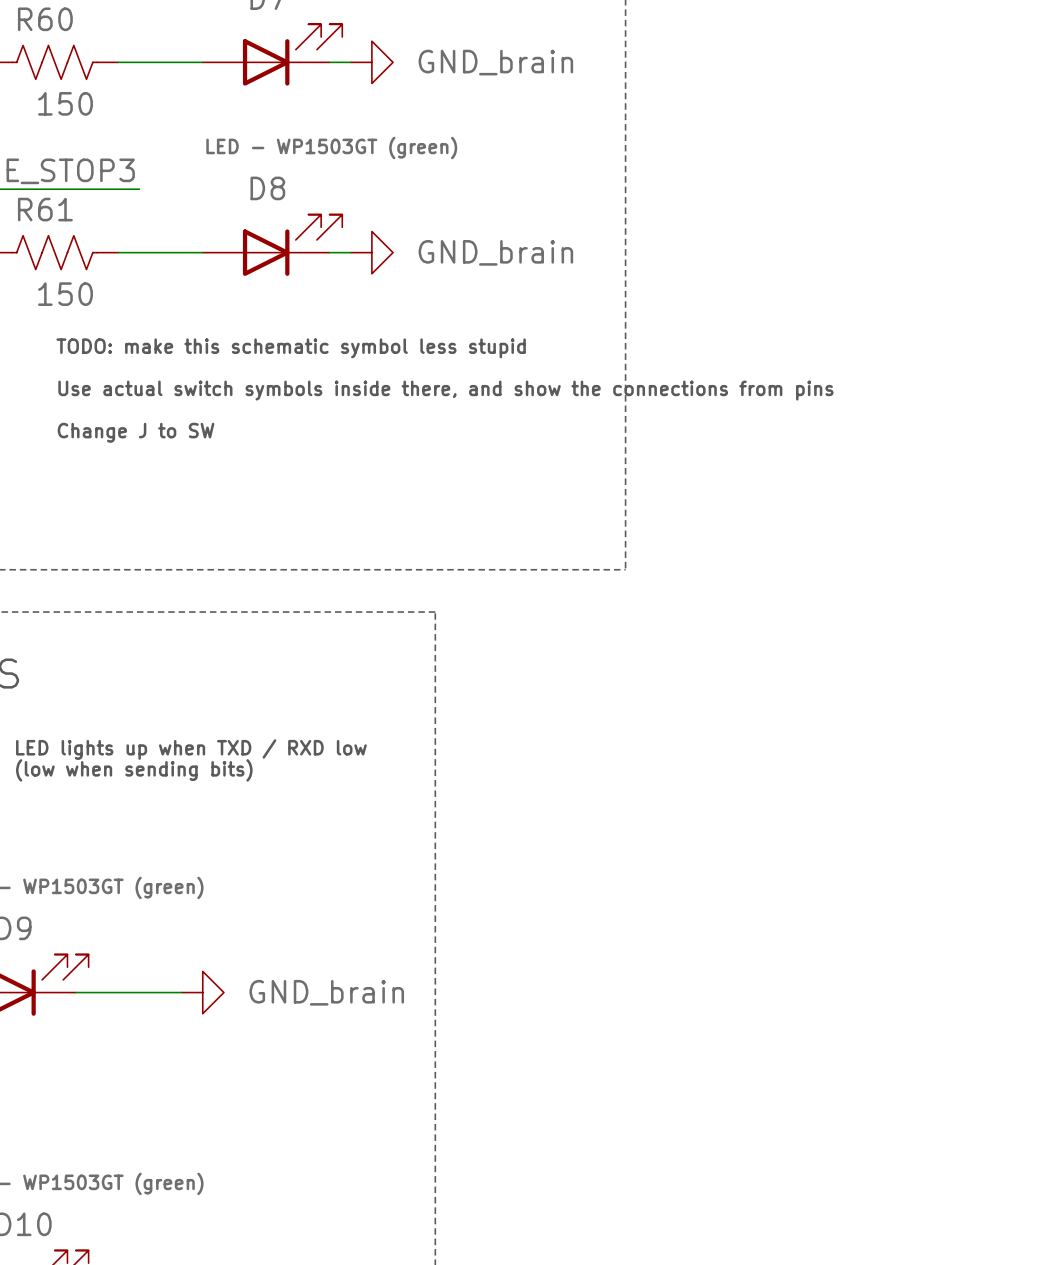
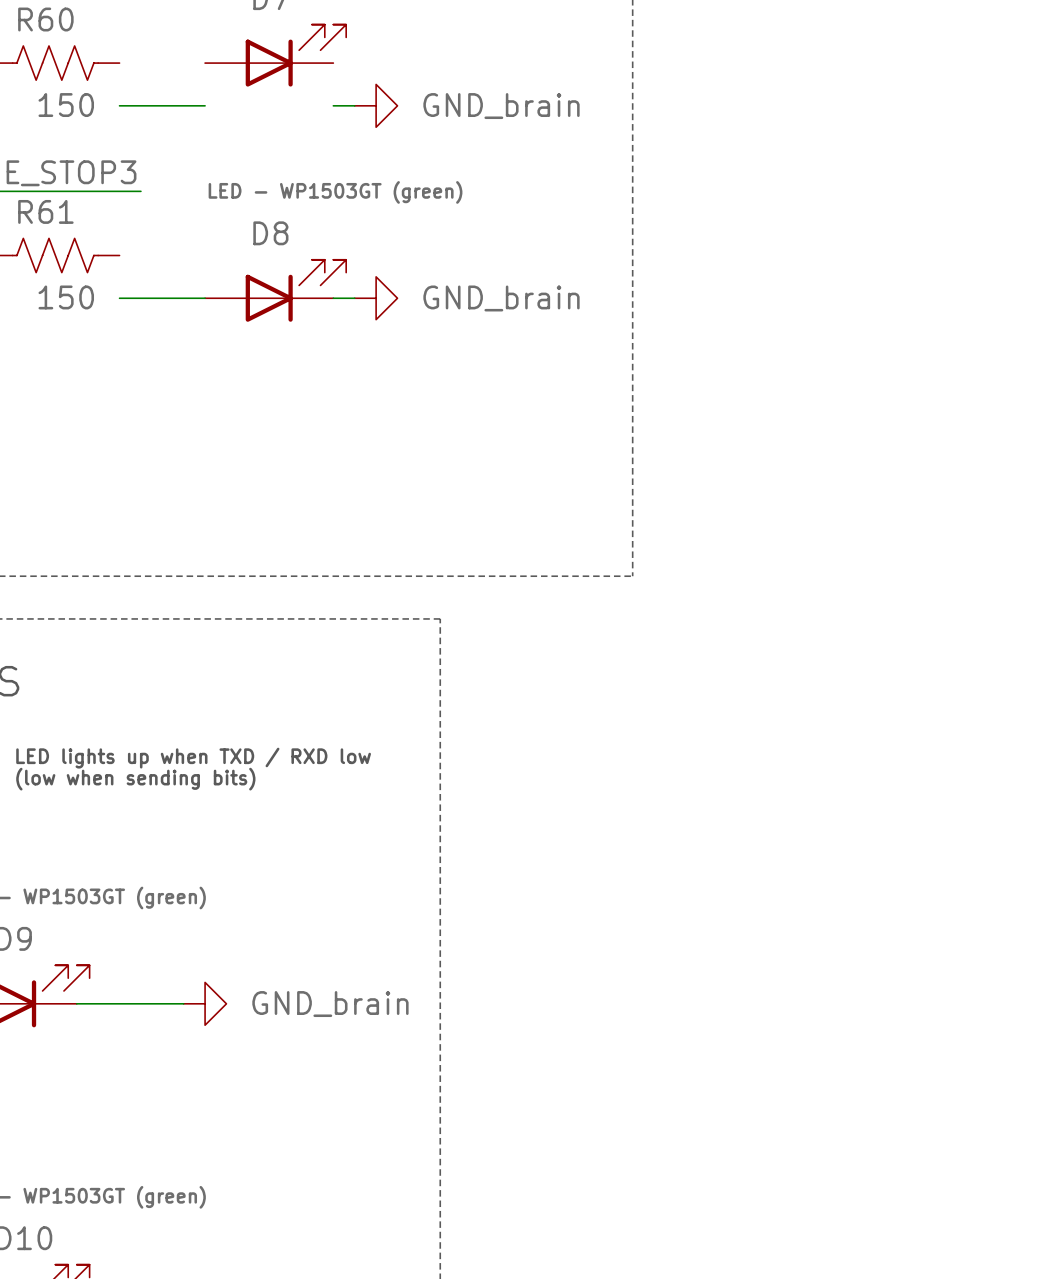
wire: (118, 62) (202, 62) -> (119, 105) (205, 105)
wire: (329, 62) (350, 62) -> (333, 105) (354, 105)
power symbol position: GND_brain (371, 62) -> GND_brain (376, 105)
D8 position: (272, 245) -> (275, 290)
wire: (118, 252) (202, 252) -> (119, 298) (205, 298)
wire: (329, 252) (350, 252) -> (333, 298) (354, 298)
power symbol position: GND_brain (371, 252) -> GND_brain (376, 298)
text: TODO: make this schematic symbol less stupid (291, 348) -> none
text: Use actual switch symbols inside there, and show the connections from pins (445, 390) -> none
text: Change J to SW (136, 432) -> none

